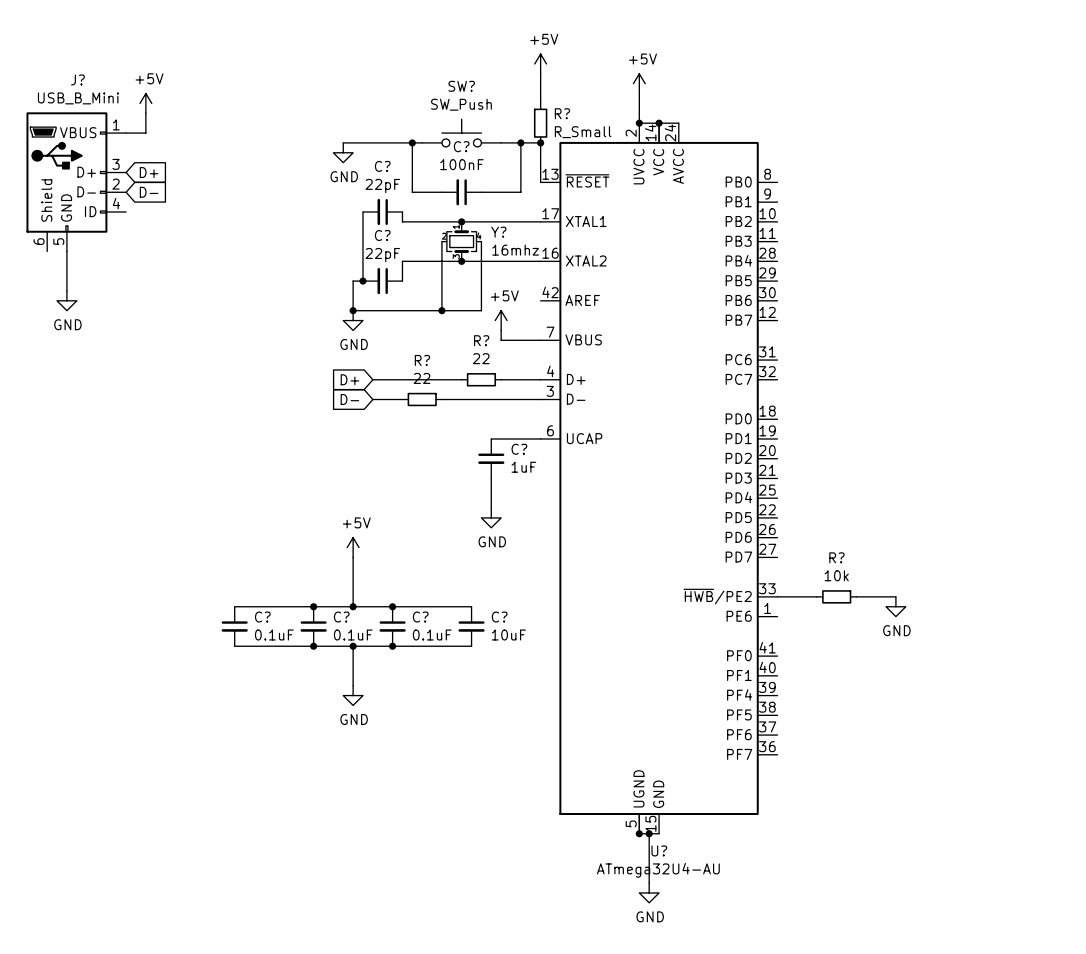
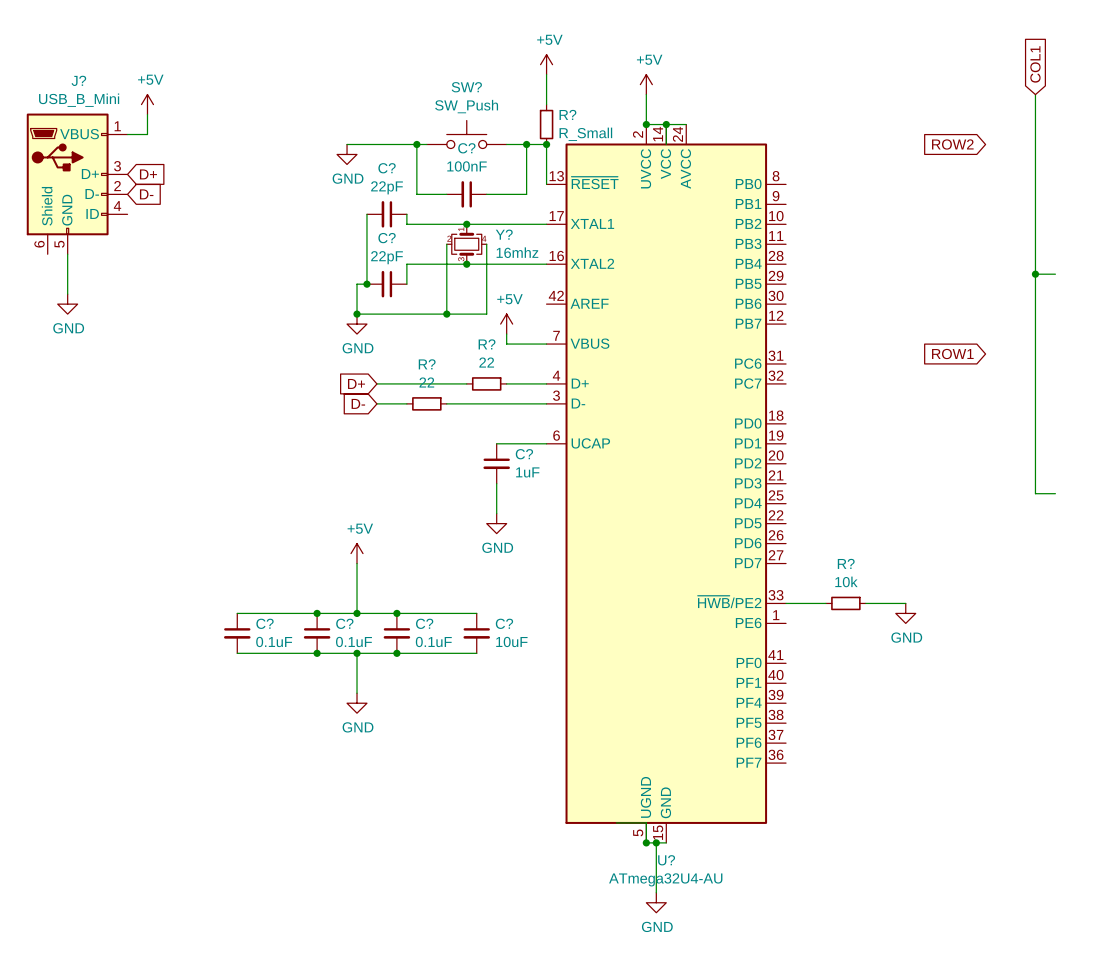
global label: none -> COL1 (1035, 64)
wire: none -> (1035, 94) (1035, 493) (1055, 493)
global label: none -> ROW2 (952, 144)
wire: none -> (1035, 274) (1055, 274)
junction: none -> (1035, 274)
global label: none -> ROW1 (952, 354)

